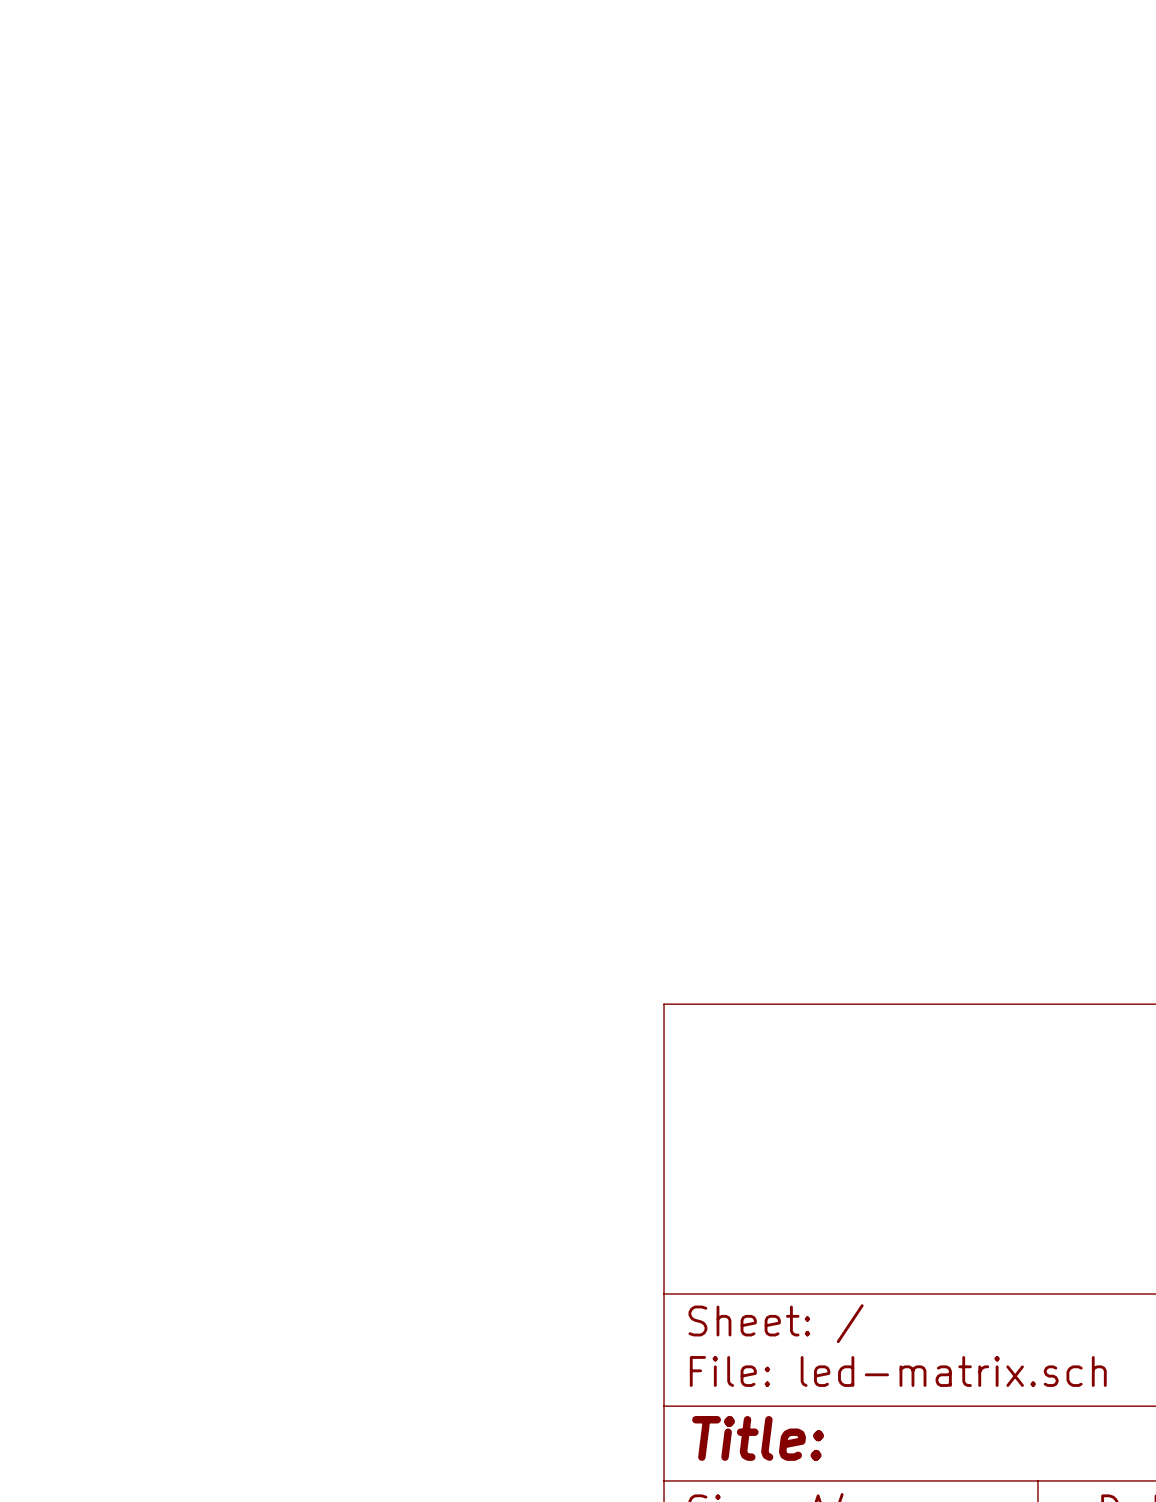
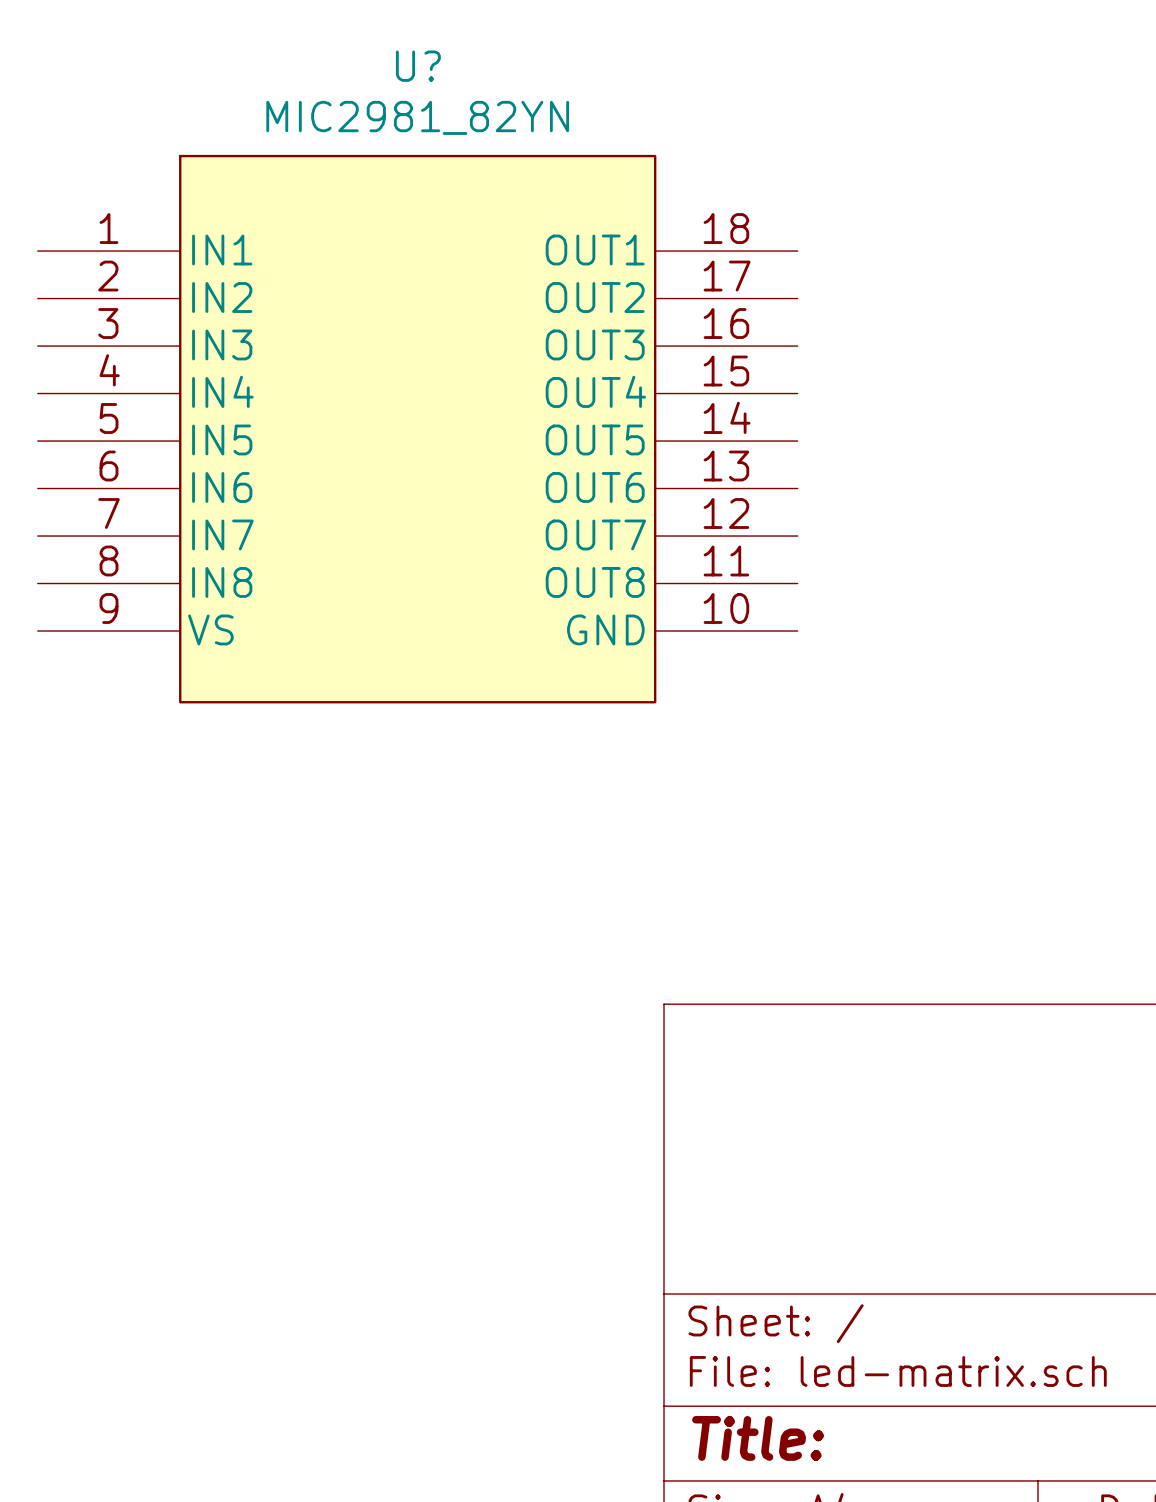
U?: none -> MIC2981_82YN (417, 429)

